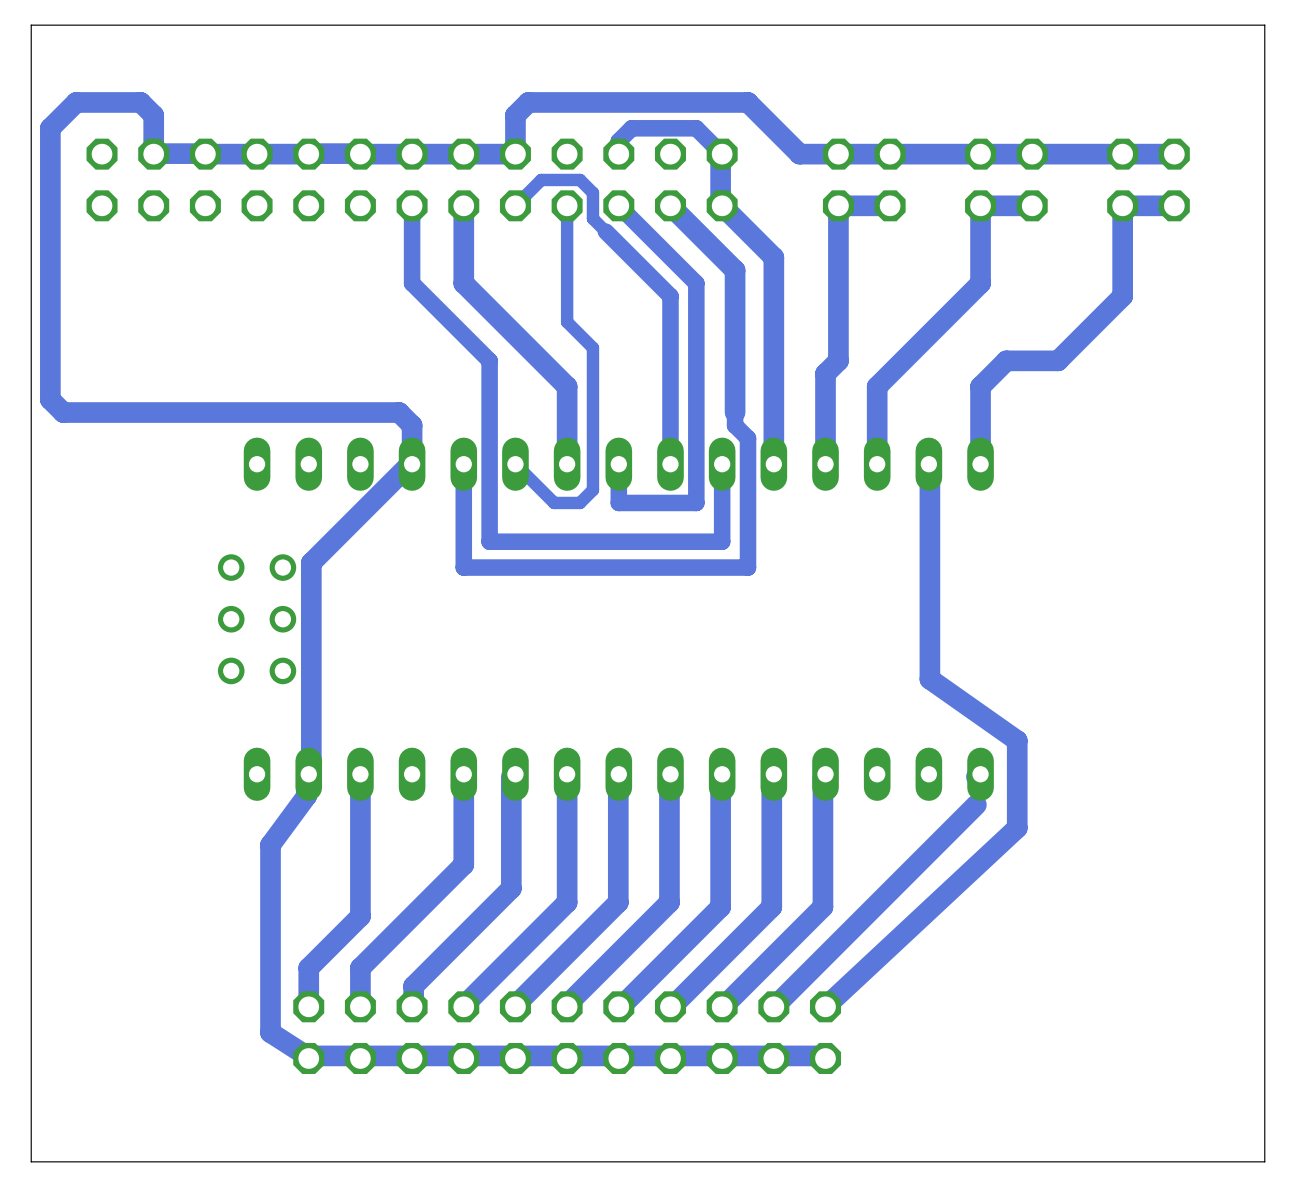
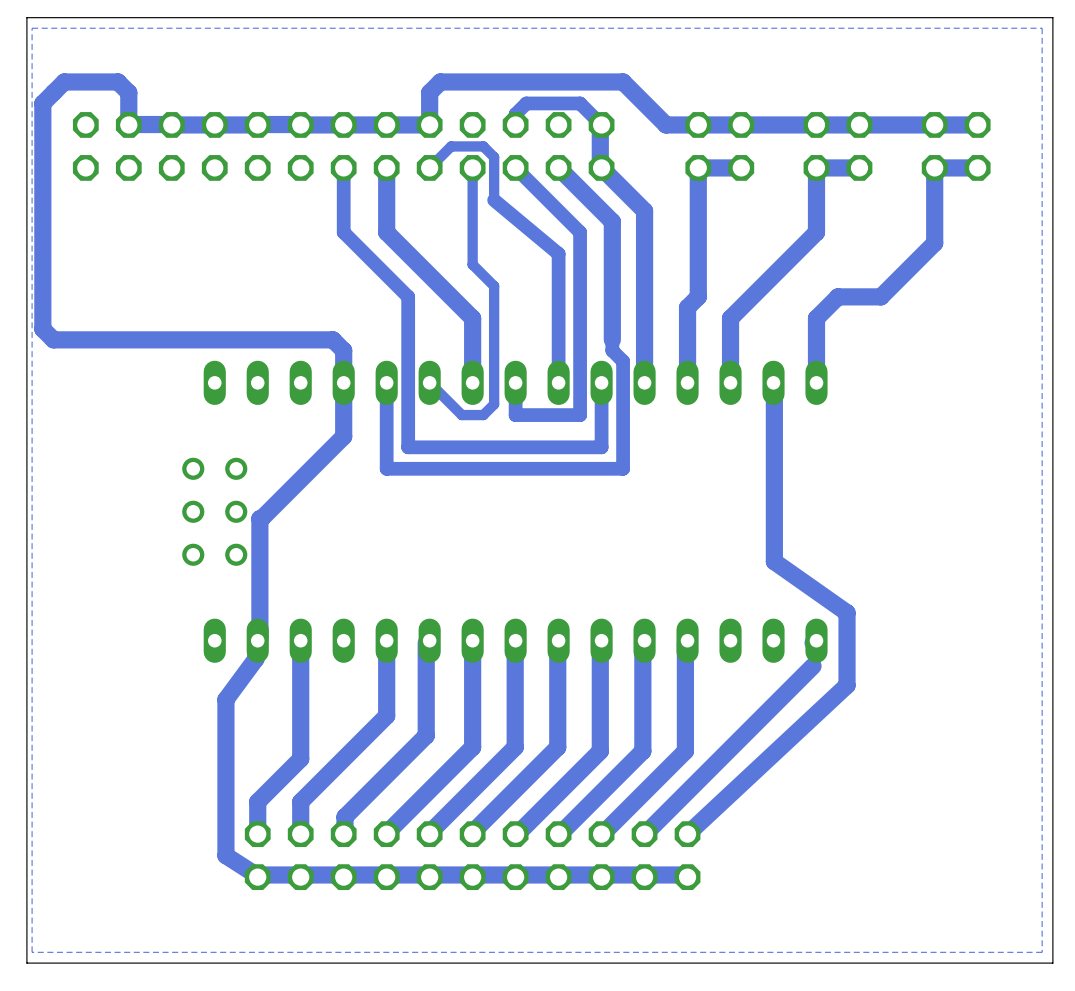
bottom zone outline: none -> (1042, 28) (1042, 952) (32, 952) (32, 28) (1042, 28)
bottom track: (592, 218) (670, 296) (670, 309) -> (494, 178) (494, 200) (558, 253)
bottom track: (412, 464) (311, 562) (311, 627) -> (343, 382) (343, 436) (259, 518)

